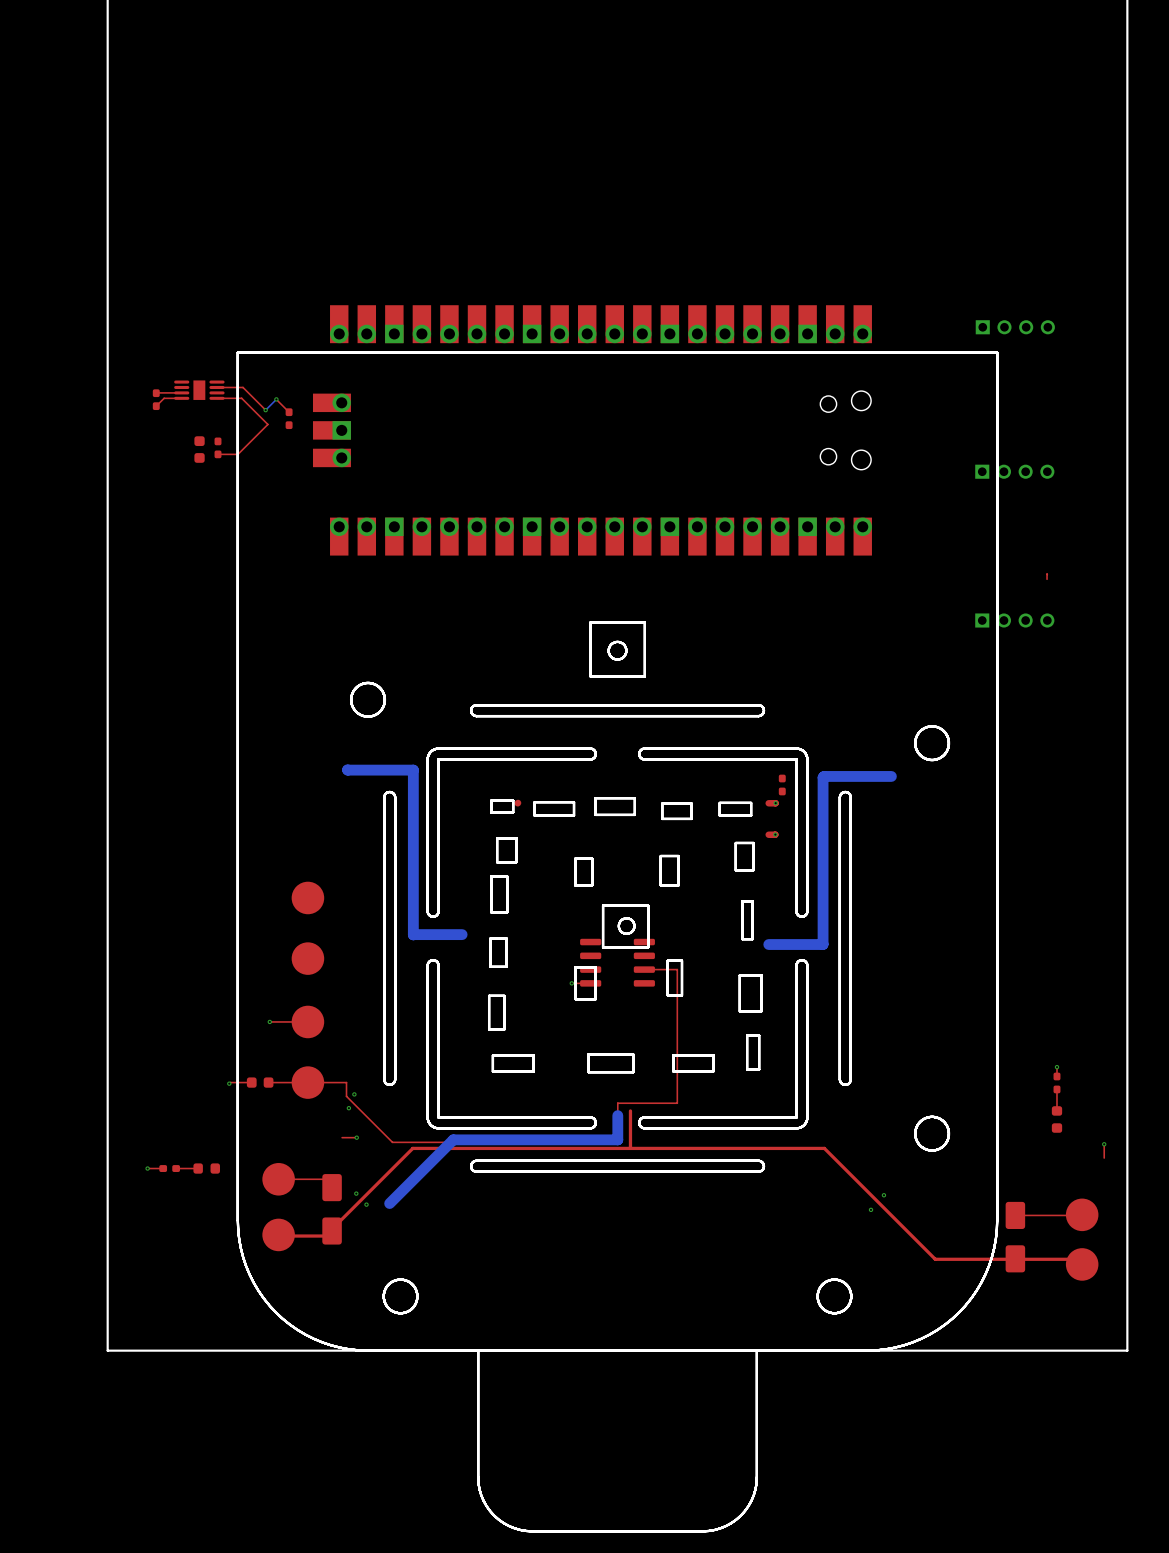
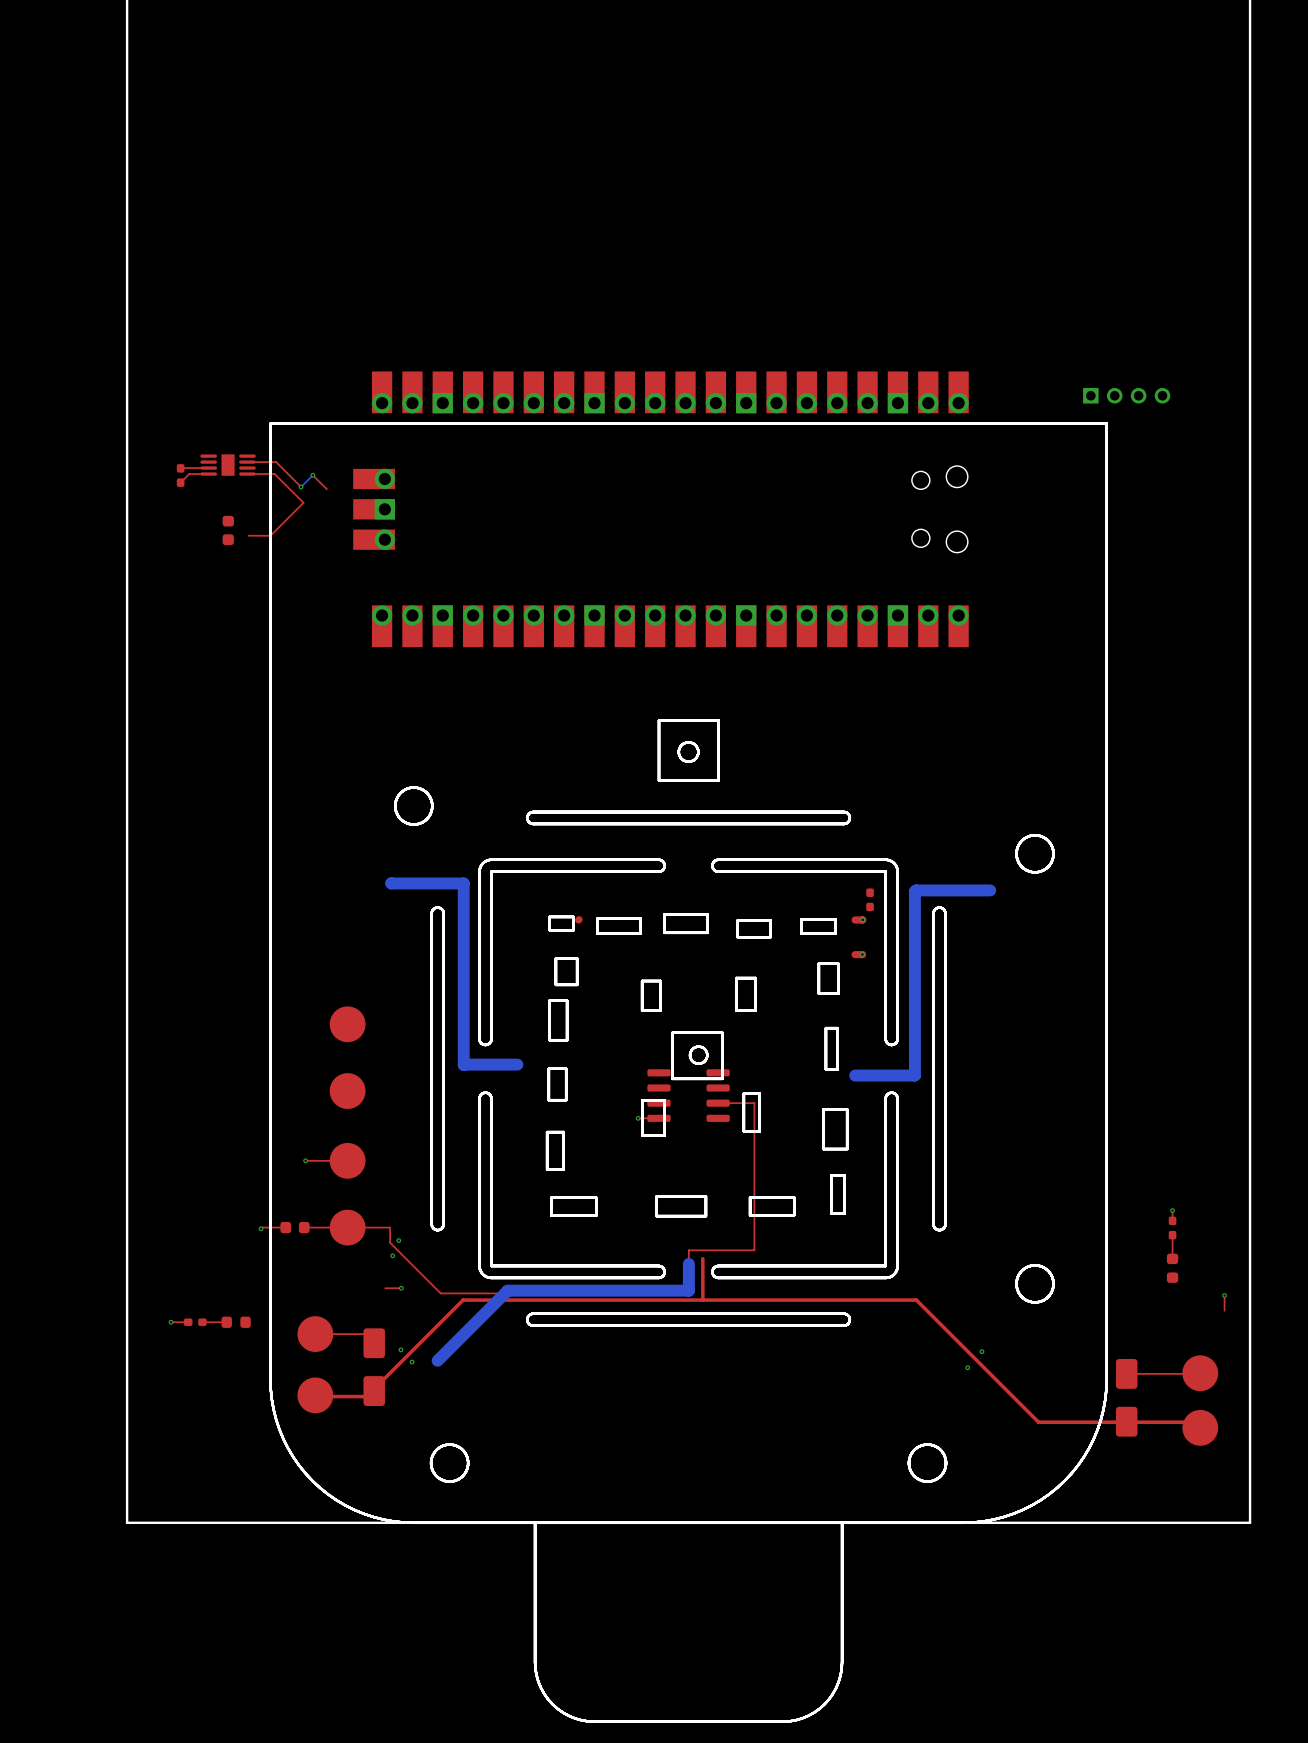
part: (289, 418) -> none
part: (218, 447) -> none
part: (1014, 471) -> none
top track: (1047, 574) (1047, 579) -> none
part: (1014, 620) -> none

